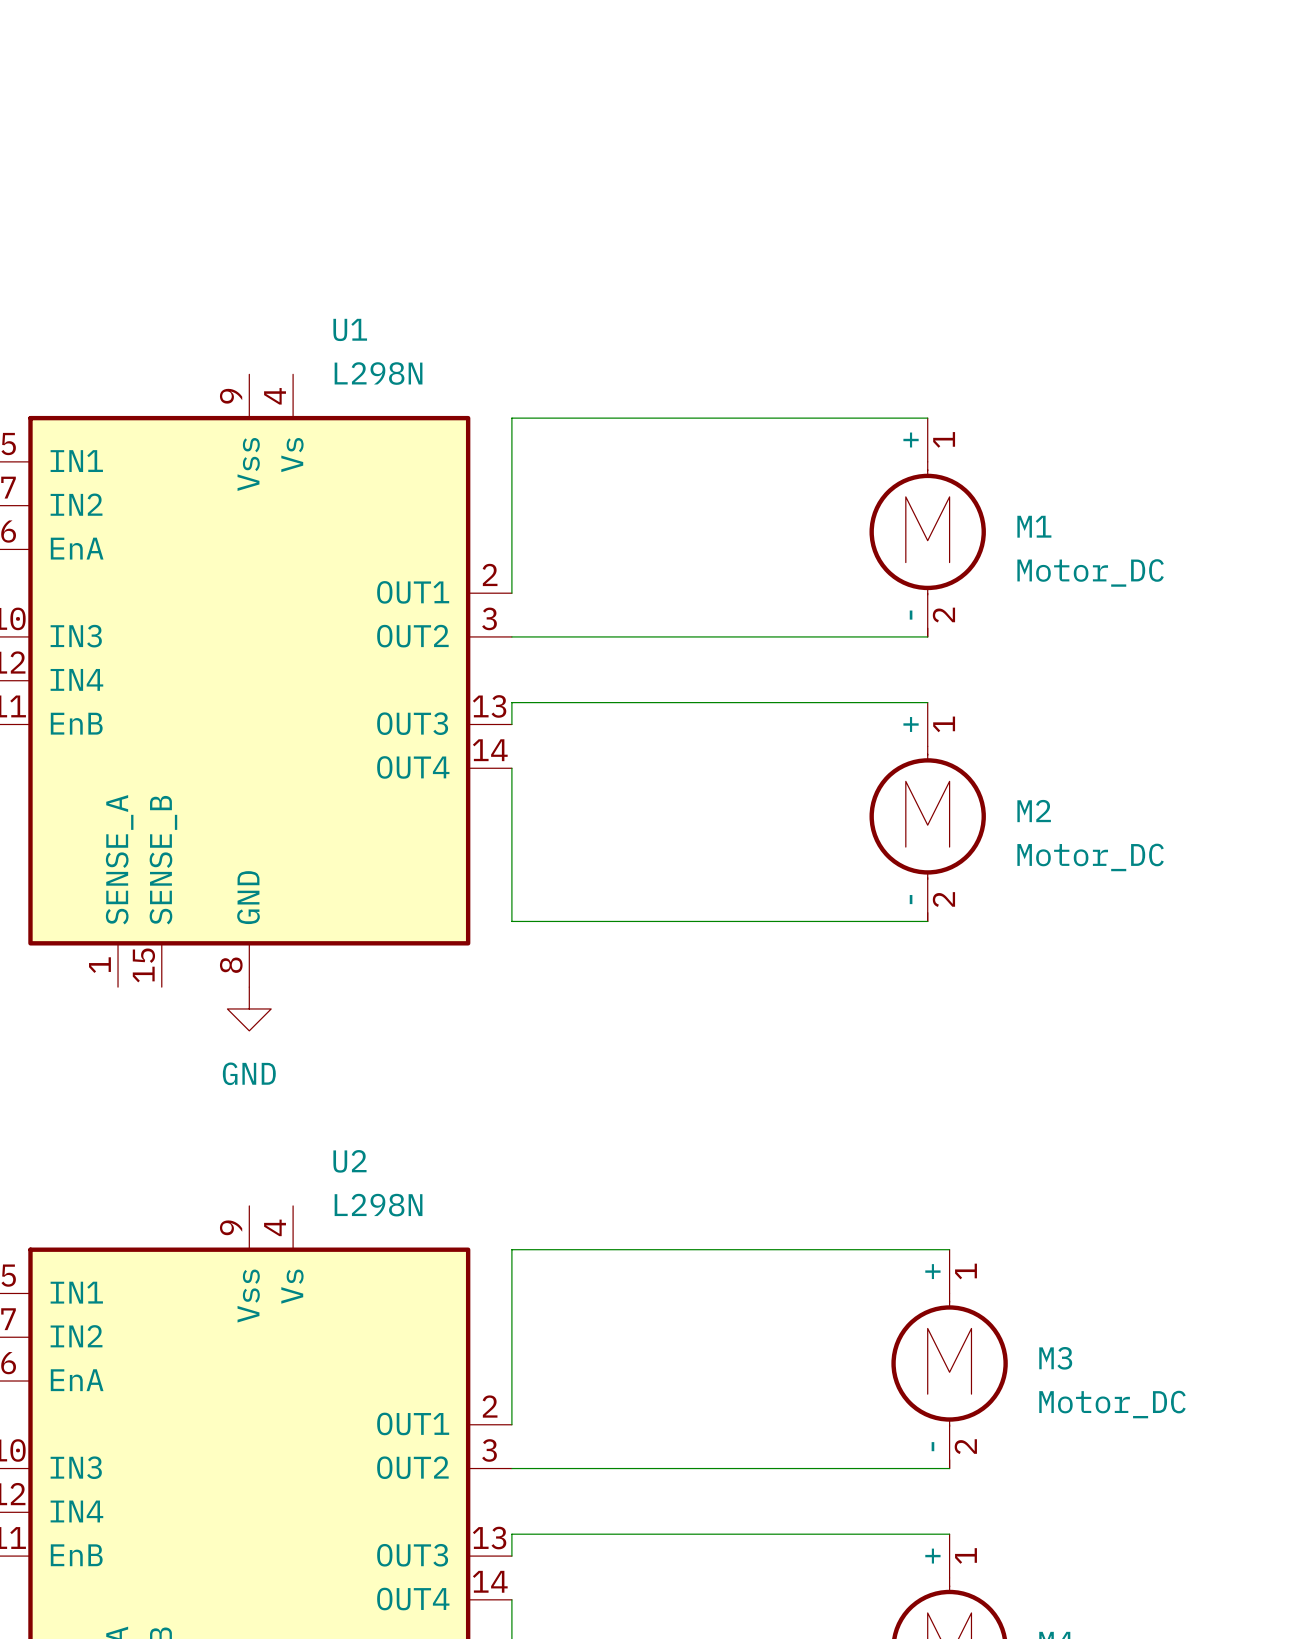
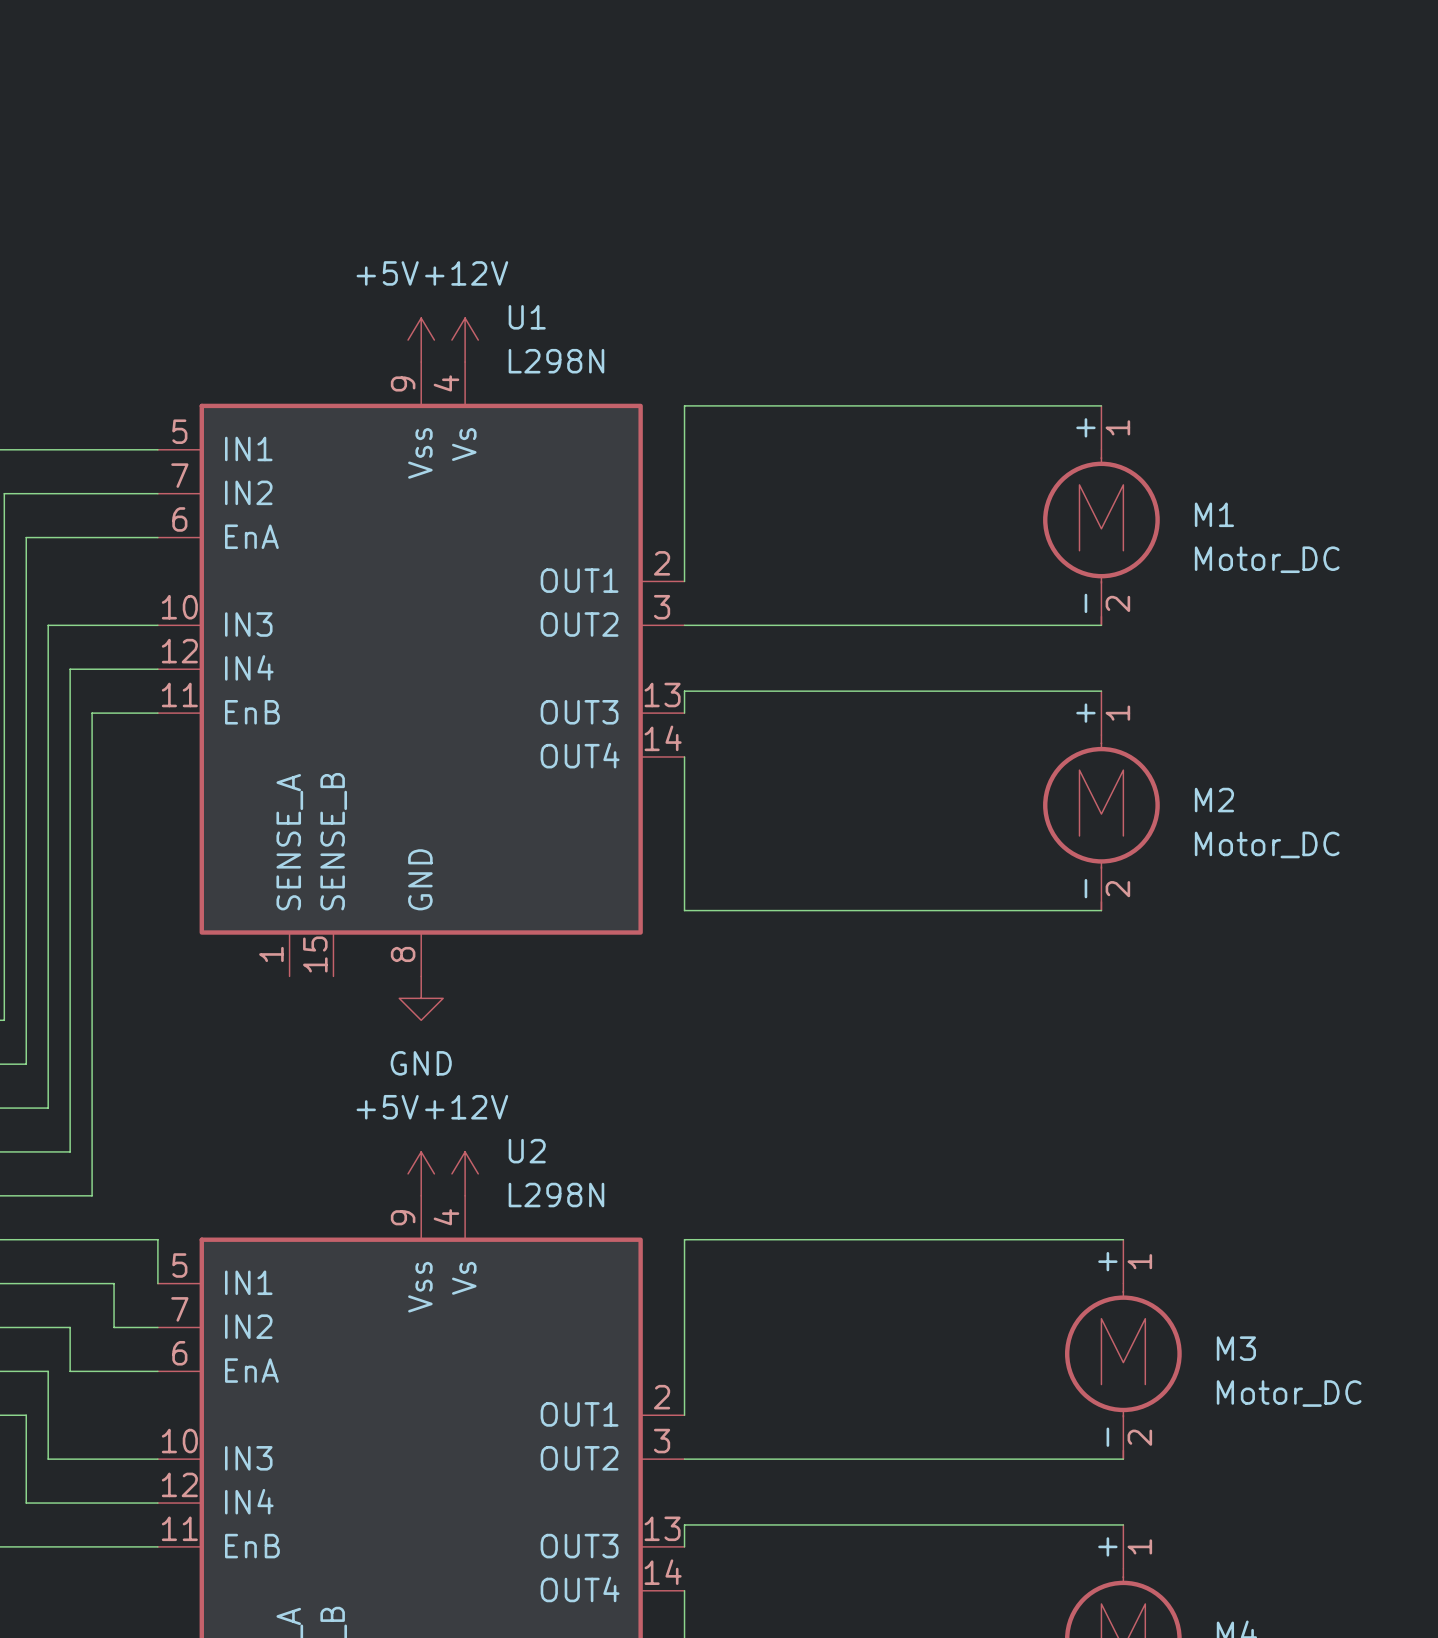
power symbol: none -> +5V (421, 340)
power symbol: none -> +12V (465, 340)
power symbol: none -> +5V (421, 1173)
power symbol: none -> +12V (465, 1173)

